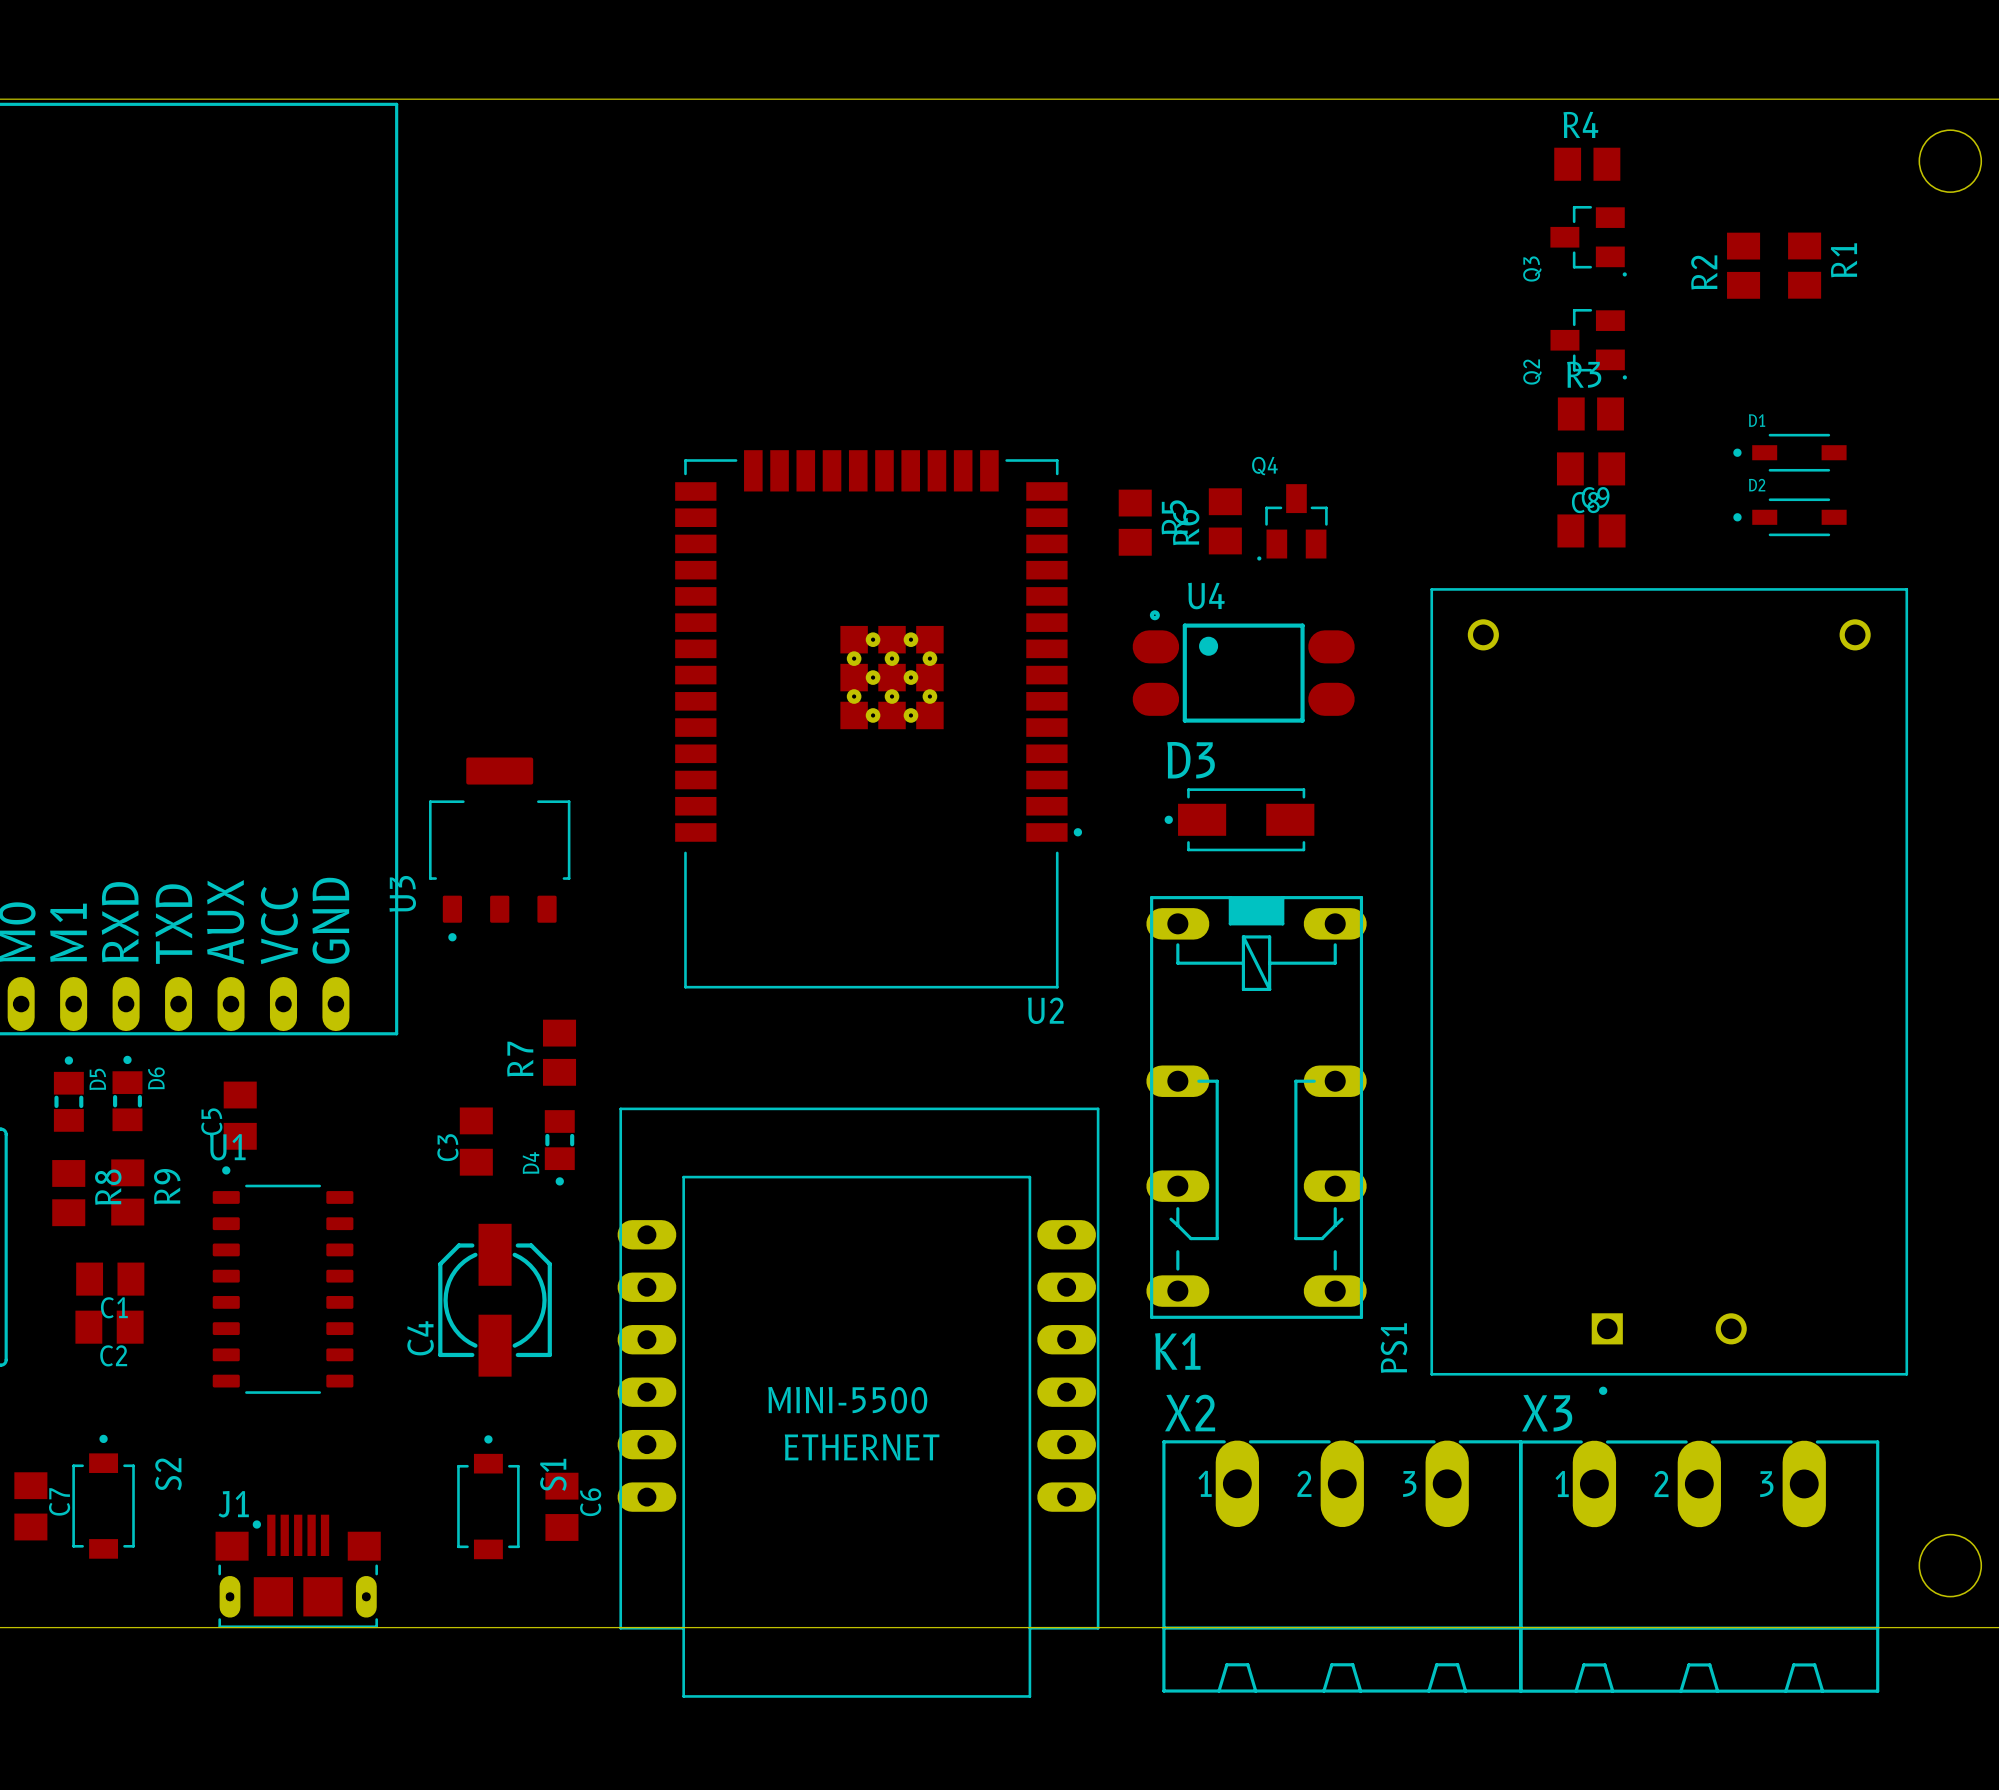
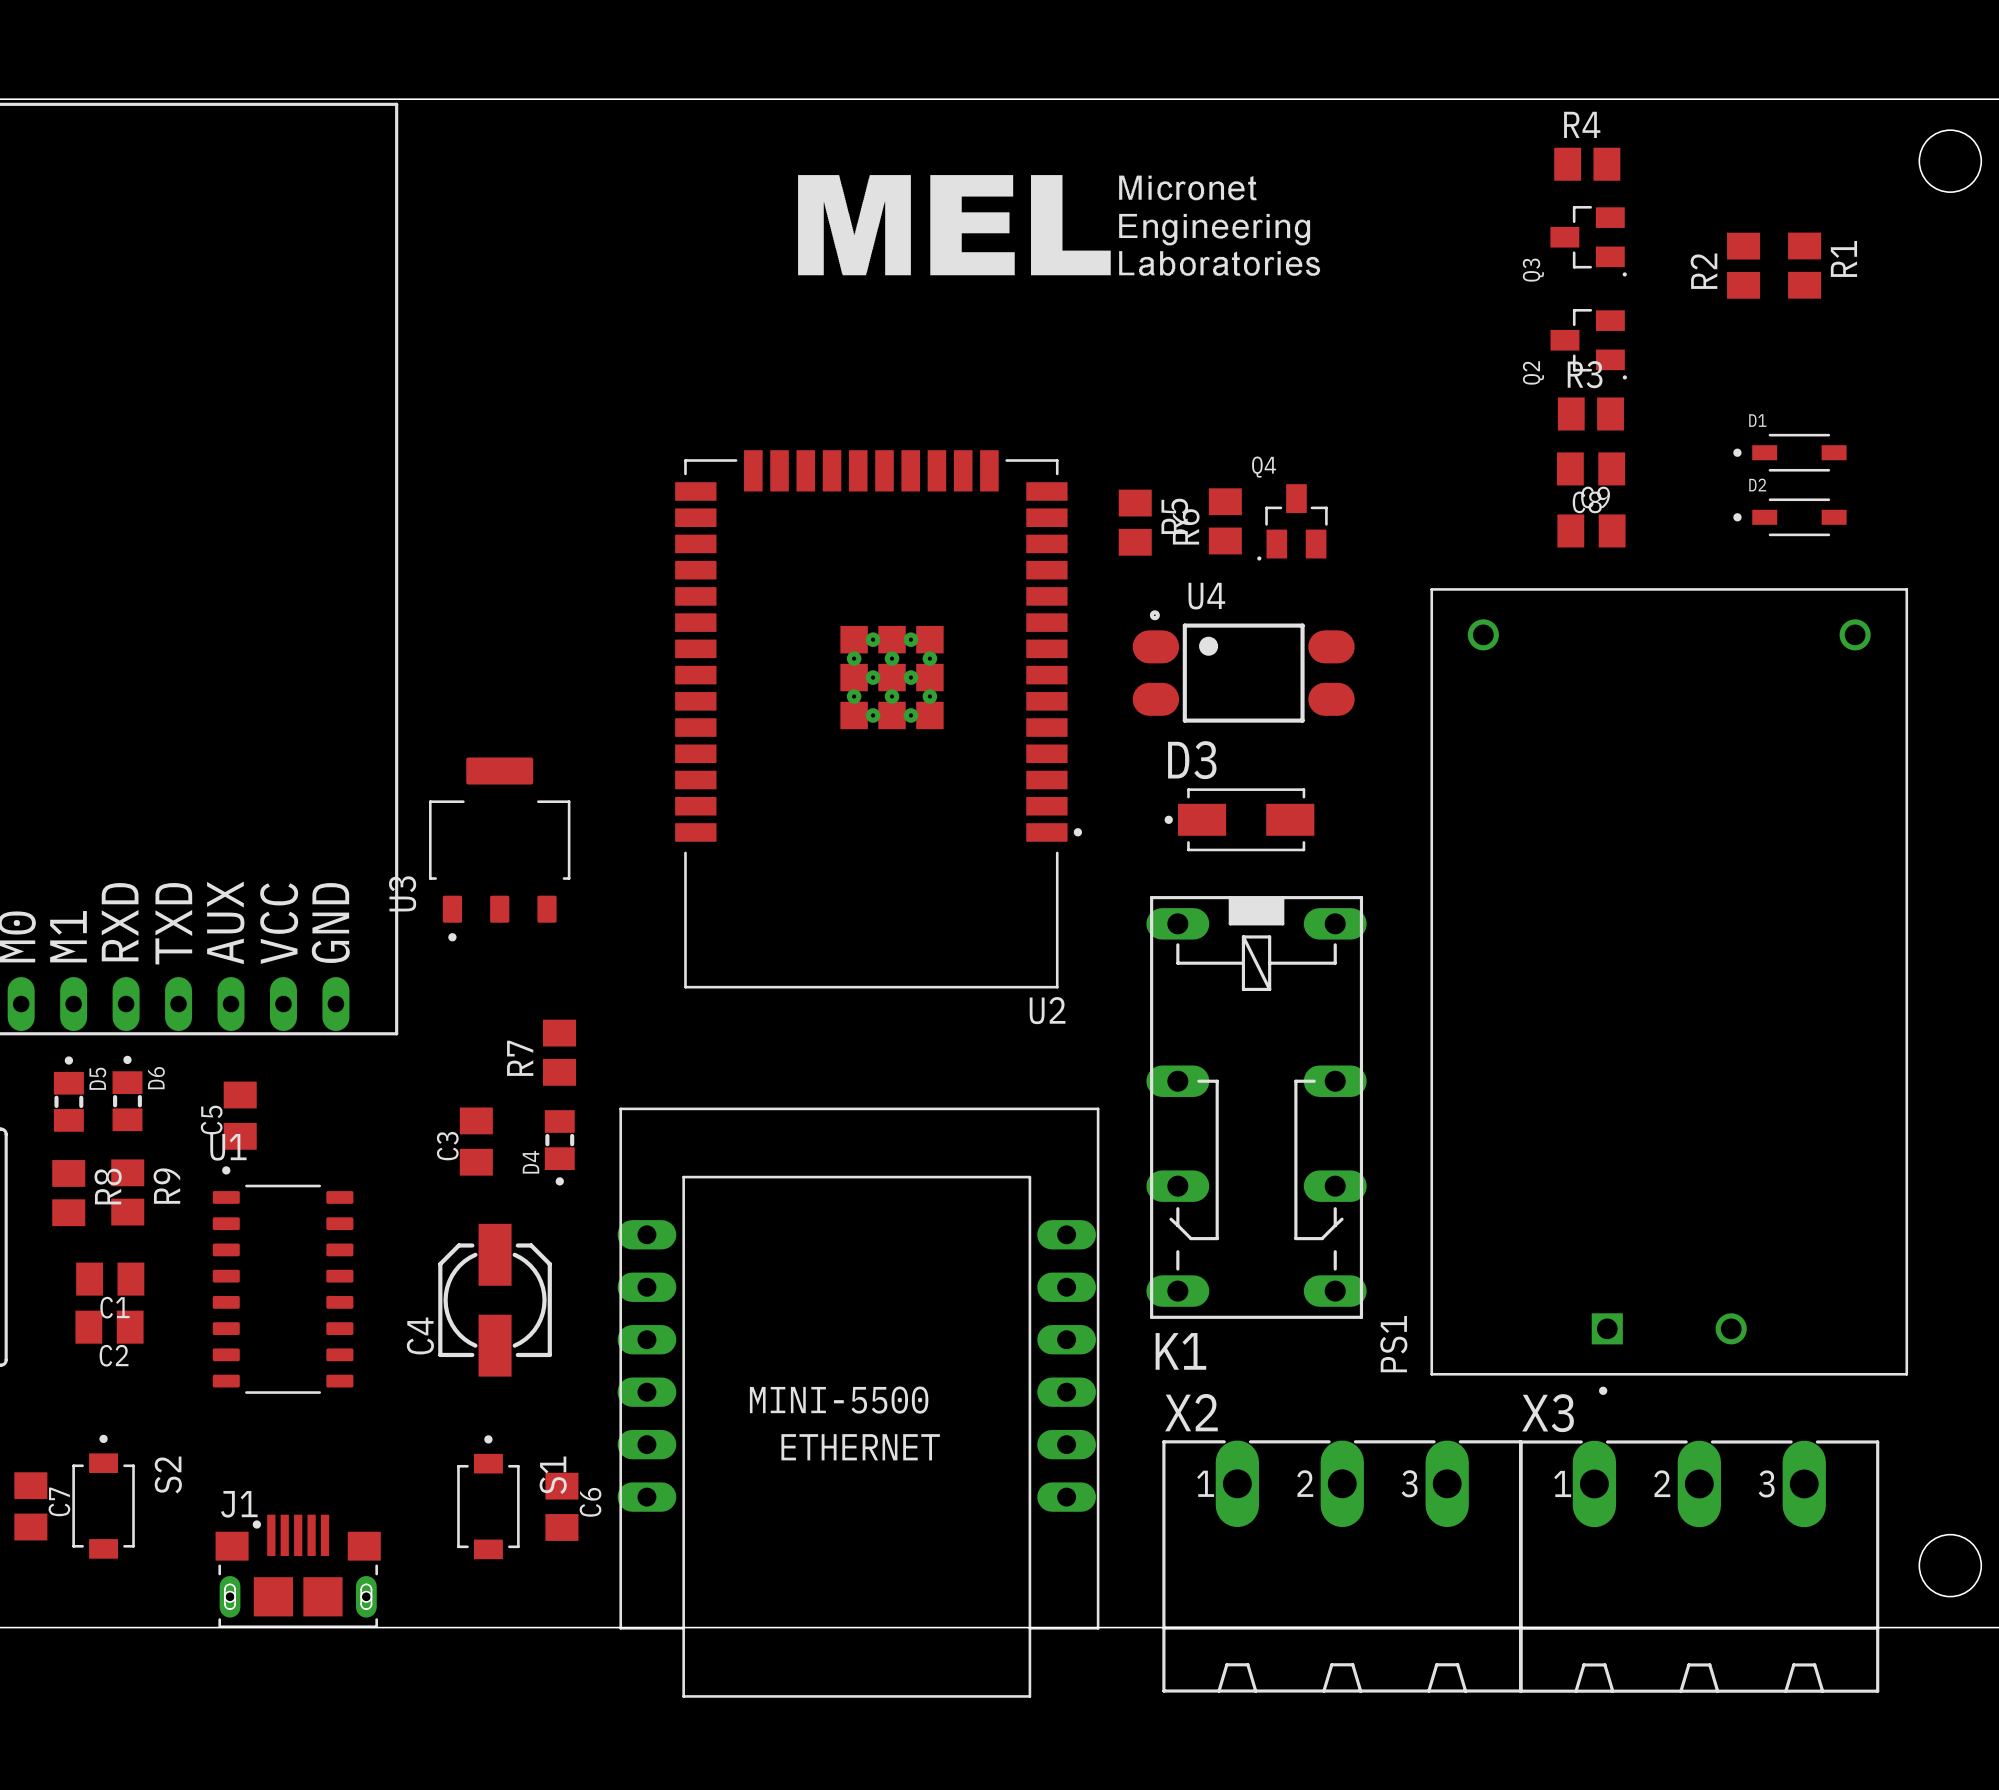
drawing: none -> [798, 175, 1321, 276]

